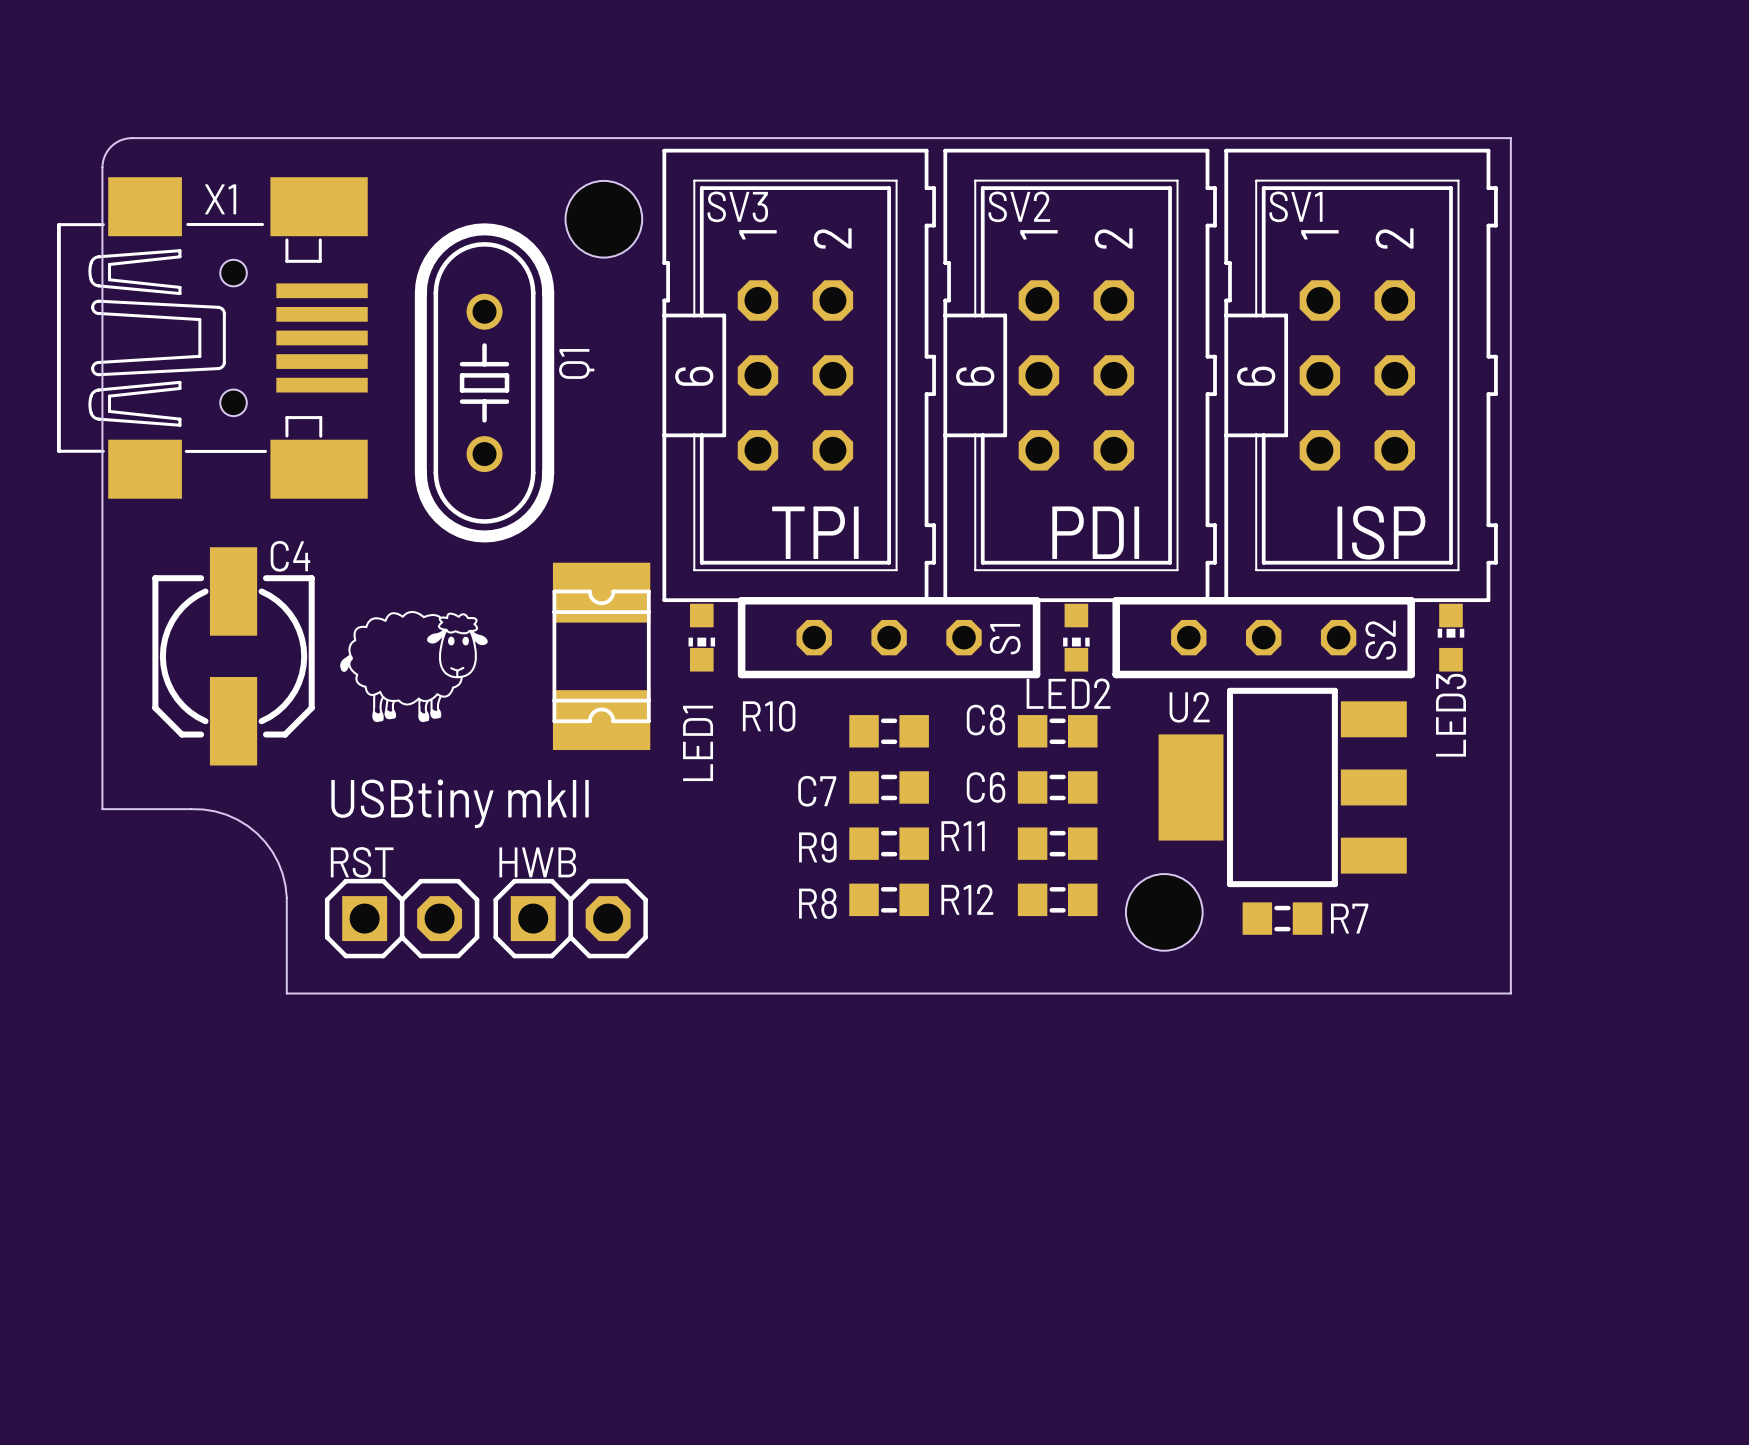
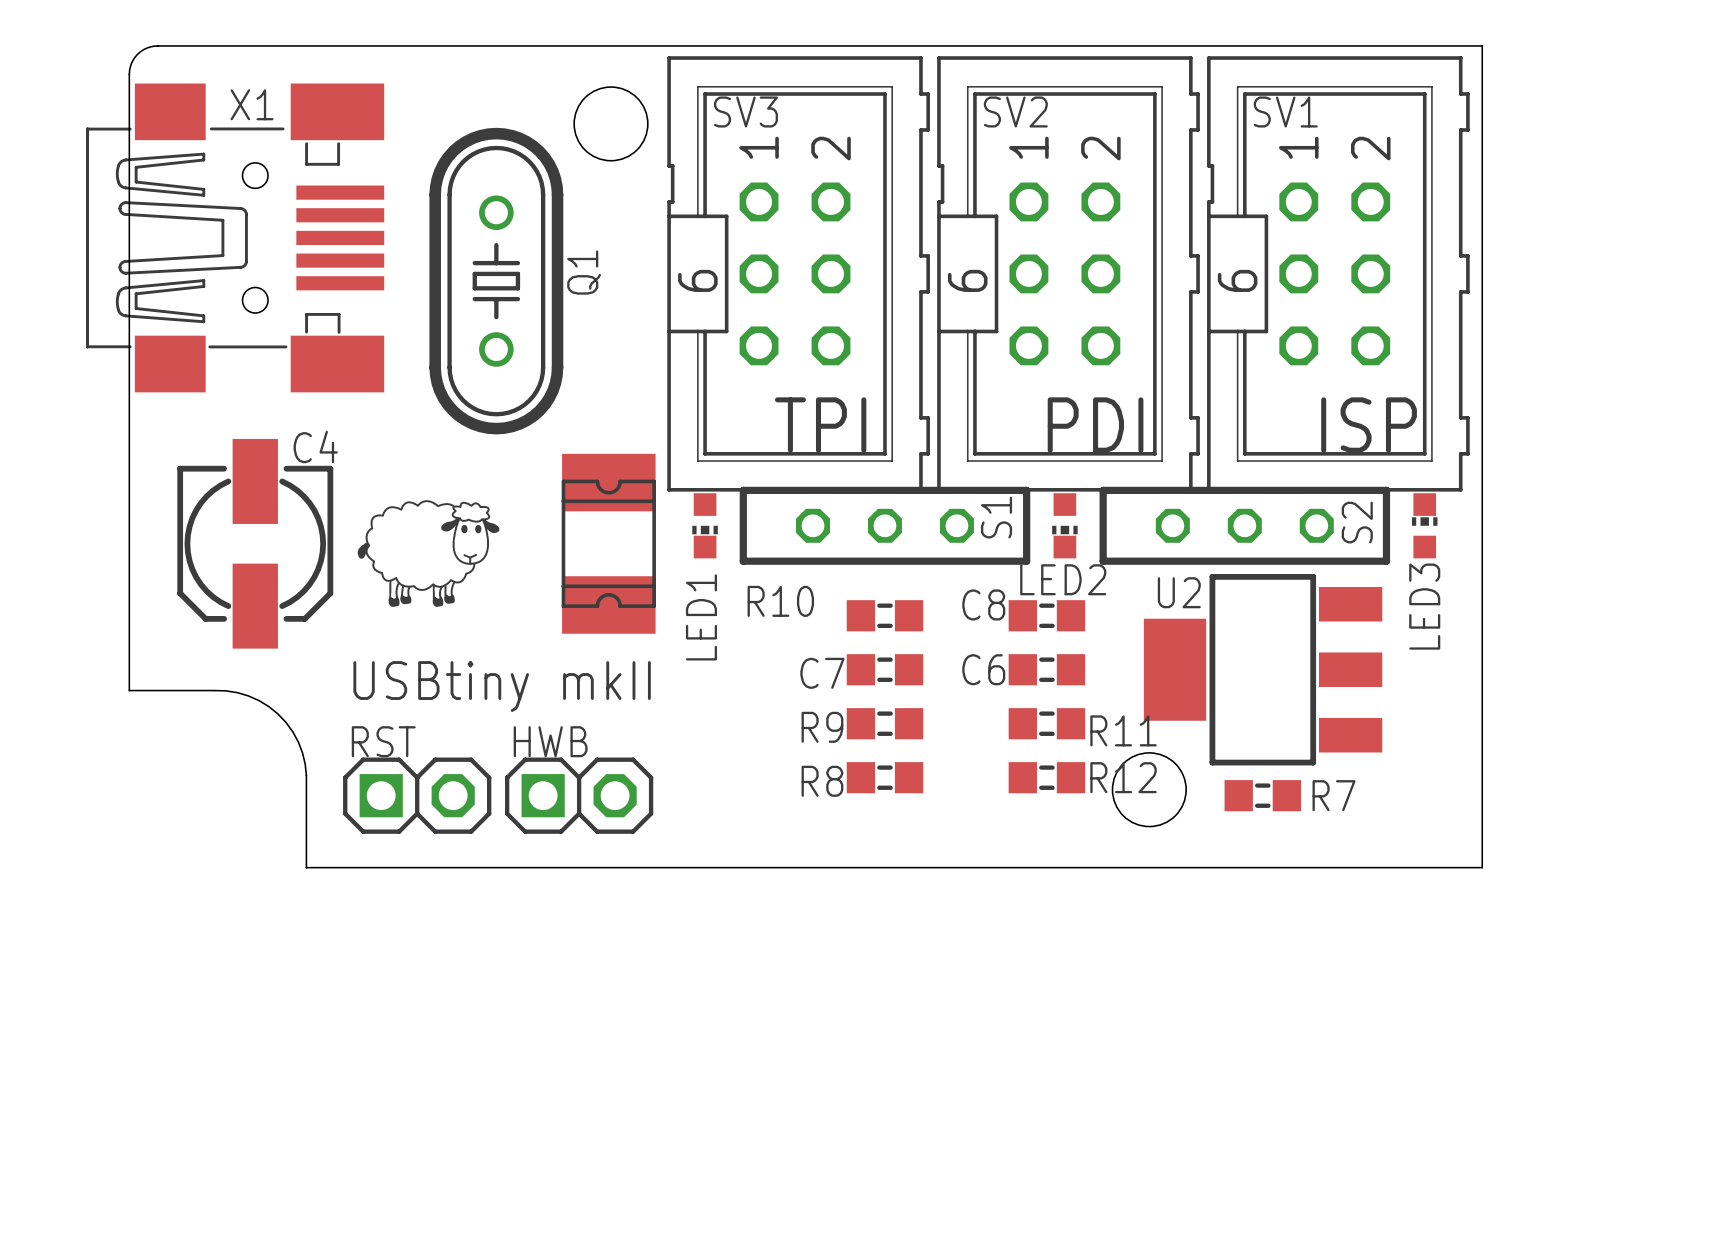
R11 name position: R11 (963, 836) -> R11 (1123, 730)
R12 name position: R12 (967, 899) -> R12 (1123, 777)

